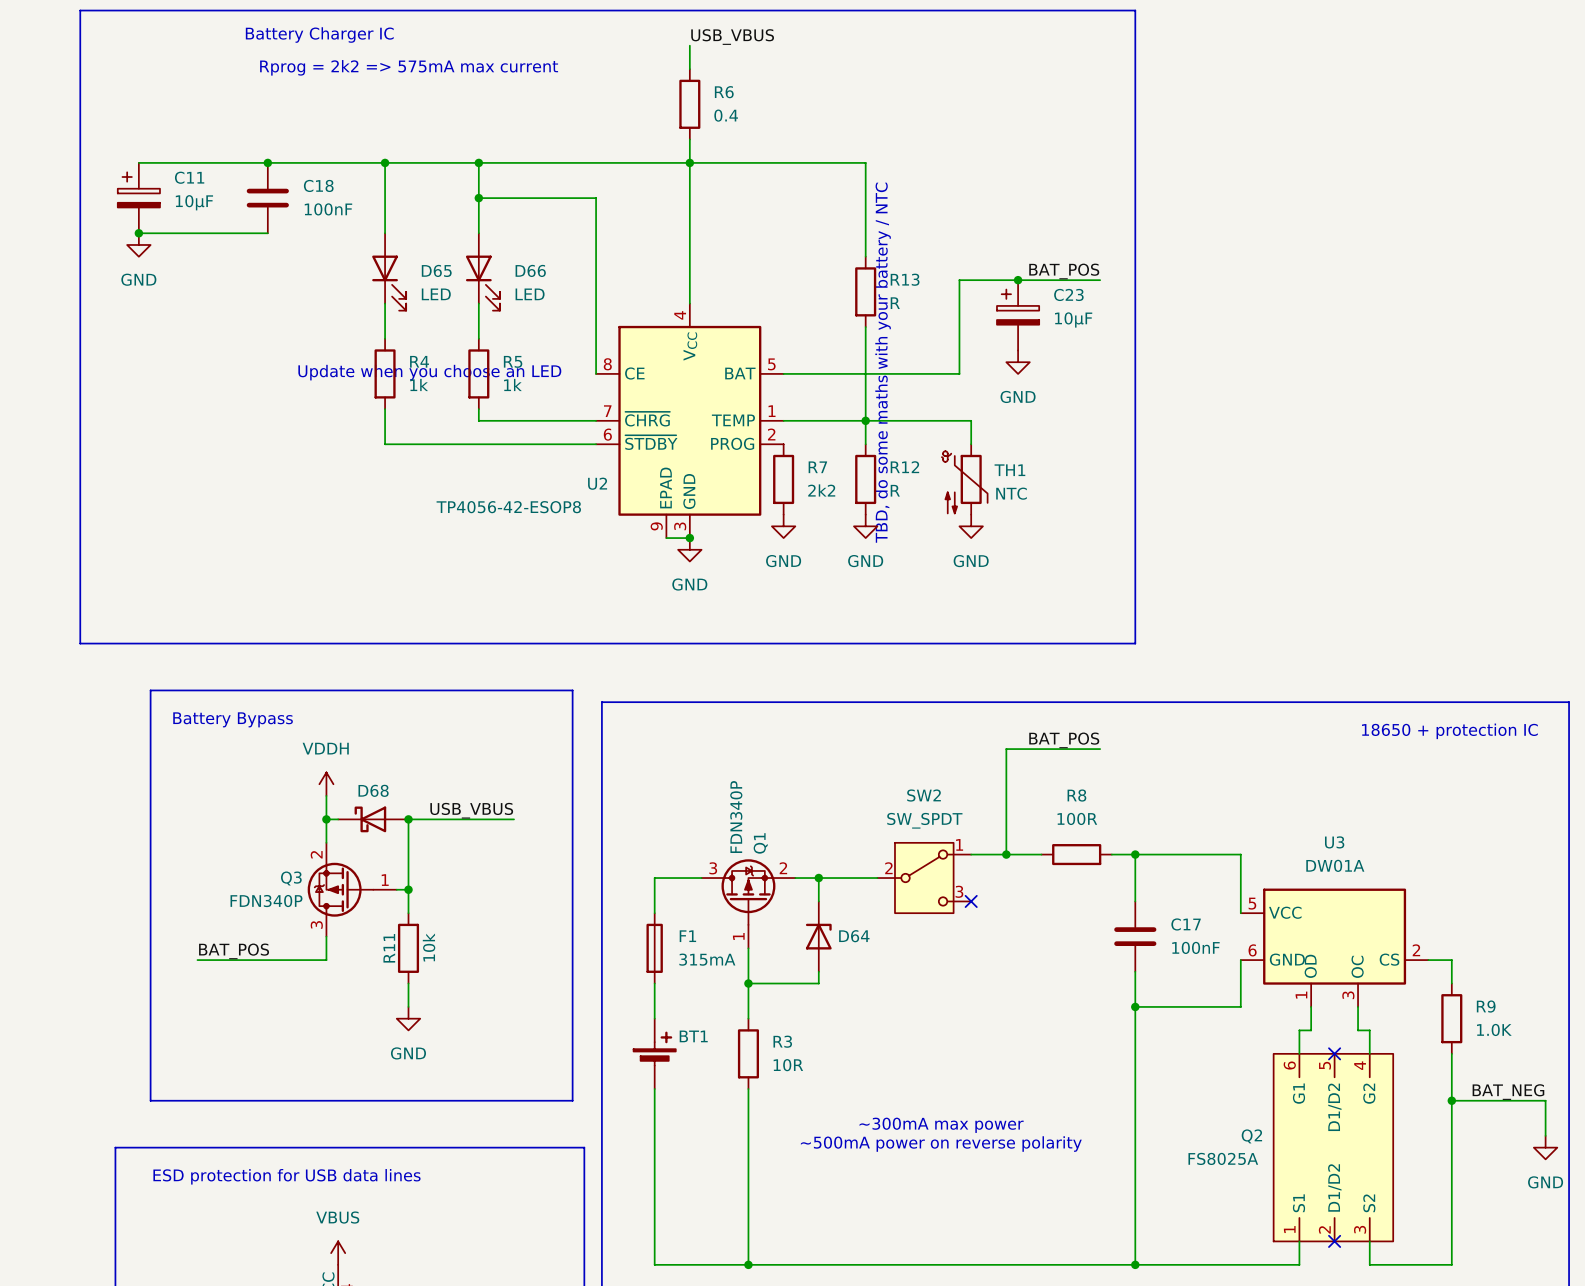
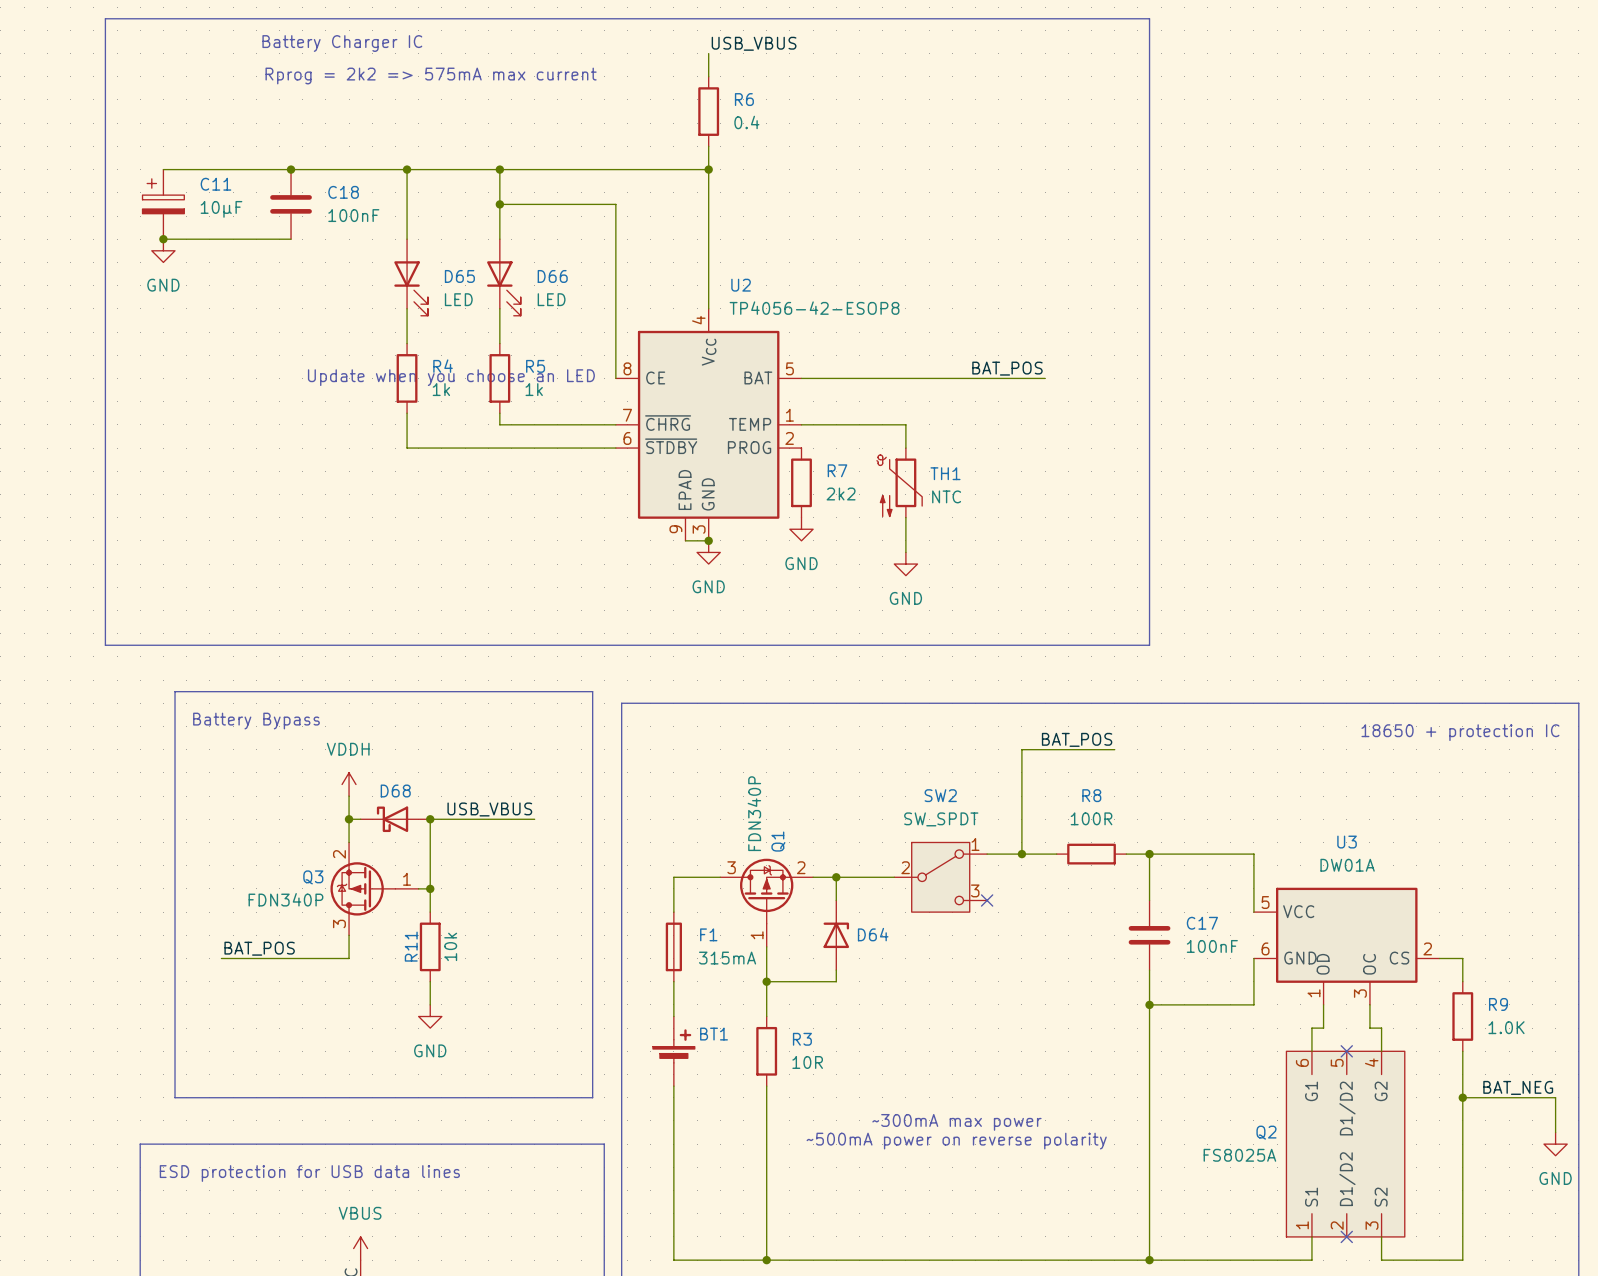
wire: (689, 162) (865, 162) (865, 256) -> none
label position: BAT_POS (1064, 271) -> BAT_POS (1007, 368)
junction: (1018, 280) -> none
wire: (1100, 280) (959, 280) (959, 373) -> (1045, 378) (975, 378)
R13: R (865, 291) -> none
C23: 10µF (1018, 315) -> none
wire: (865, 327) (865, 444) -> none
text: TBD, do some maths with your battery / NTC (883, 362) -> none
power symbol: GND (1018, 362) -> none
junction: (865, 420) -> none
wire: (889, 420) (971, 420) (971, 444) -> (905, 424) (905, 448)
R12: R (865, 479) -> none
TH1 position: (964, 479) -> (899, 482)
U2 name position: U2 (597, 483) -> U2 (741, 285)
U2 value position: TP4056-42-ESOP8 (508, 507) -> TP4056-42-ESOP8 (814, 308)
wire: none -> (905, 517) (905, 552)
power symbol position: GND (865, 526) -> GND (905, 564)
power symbol: GND (971, 526) -> none

